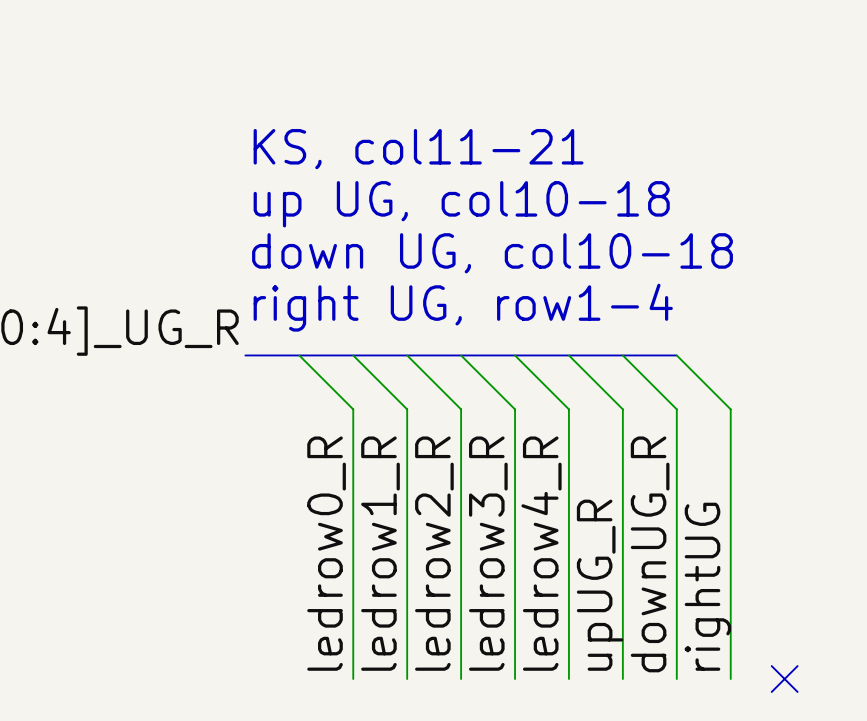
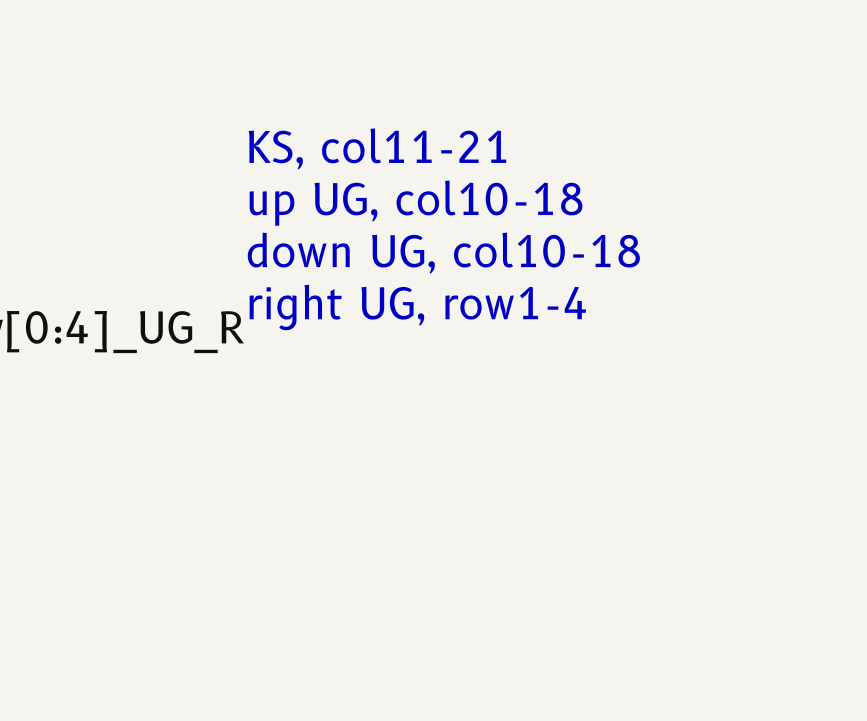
bus: (245, 355) (676, 355) -> none
wire: (299, 355) (353, 409) (353, 679) -> none
wire: (353, 355) (407, 409) (407, 679) -> none
wire: (407, 355) (461, 409) (461, 679) -> none
wire: (461, 355) (515, 409) (515, 679) -> none
wire: (515, 355) (568, 409) (568, 679) -> none
wire: (568, 355) (622, 409) (622, 679) -> none
wire: (622, 355) (676, 409) (676, 679) -> none
wire: (676, 355) (730, 409) (730, 679) -> none
label: ledrow0_R (326, 553) -> none
label: ledrow1_R (380, 553) -> none
label: ledrow2_R (434, 553) -> none
label: ledrow3_R (488, 553) -> none
label: ledrow4_R (541, 553) -> none
label: downUG_R (650, 554) -> none
label: upUG_R (600, 585) -> none
label: rightUG (707, 586) -> none
no-connect mark: (784, 679) -> none

